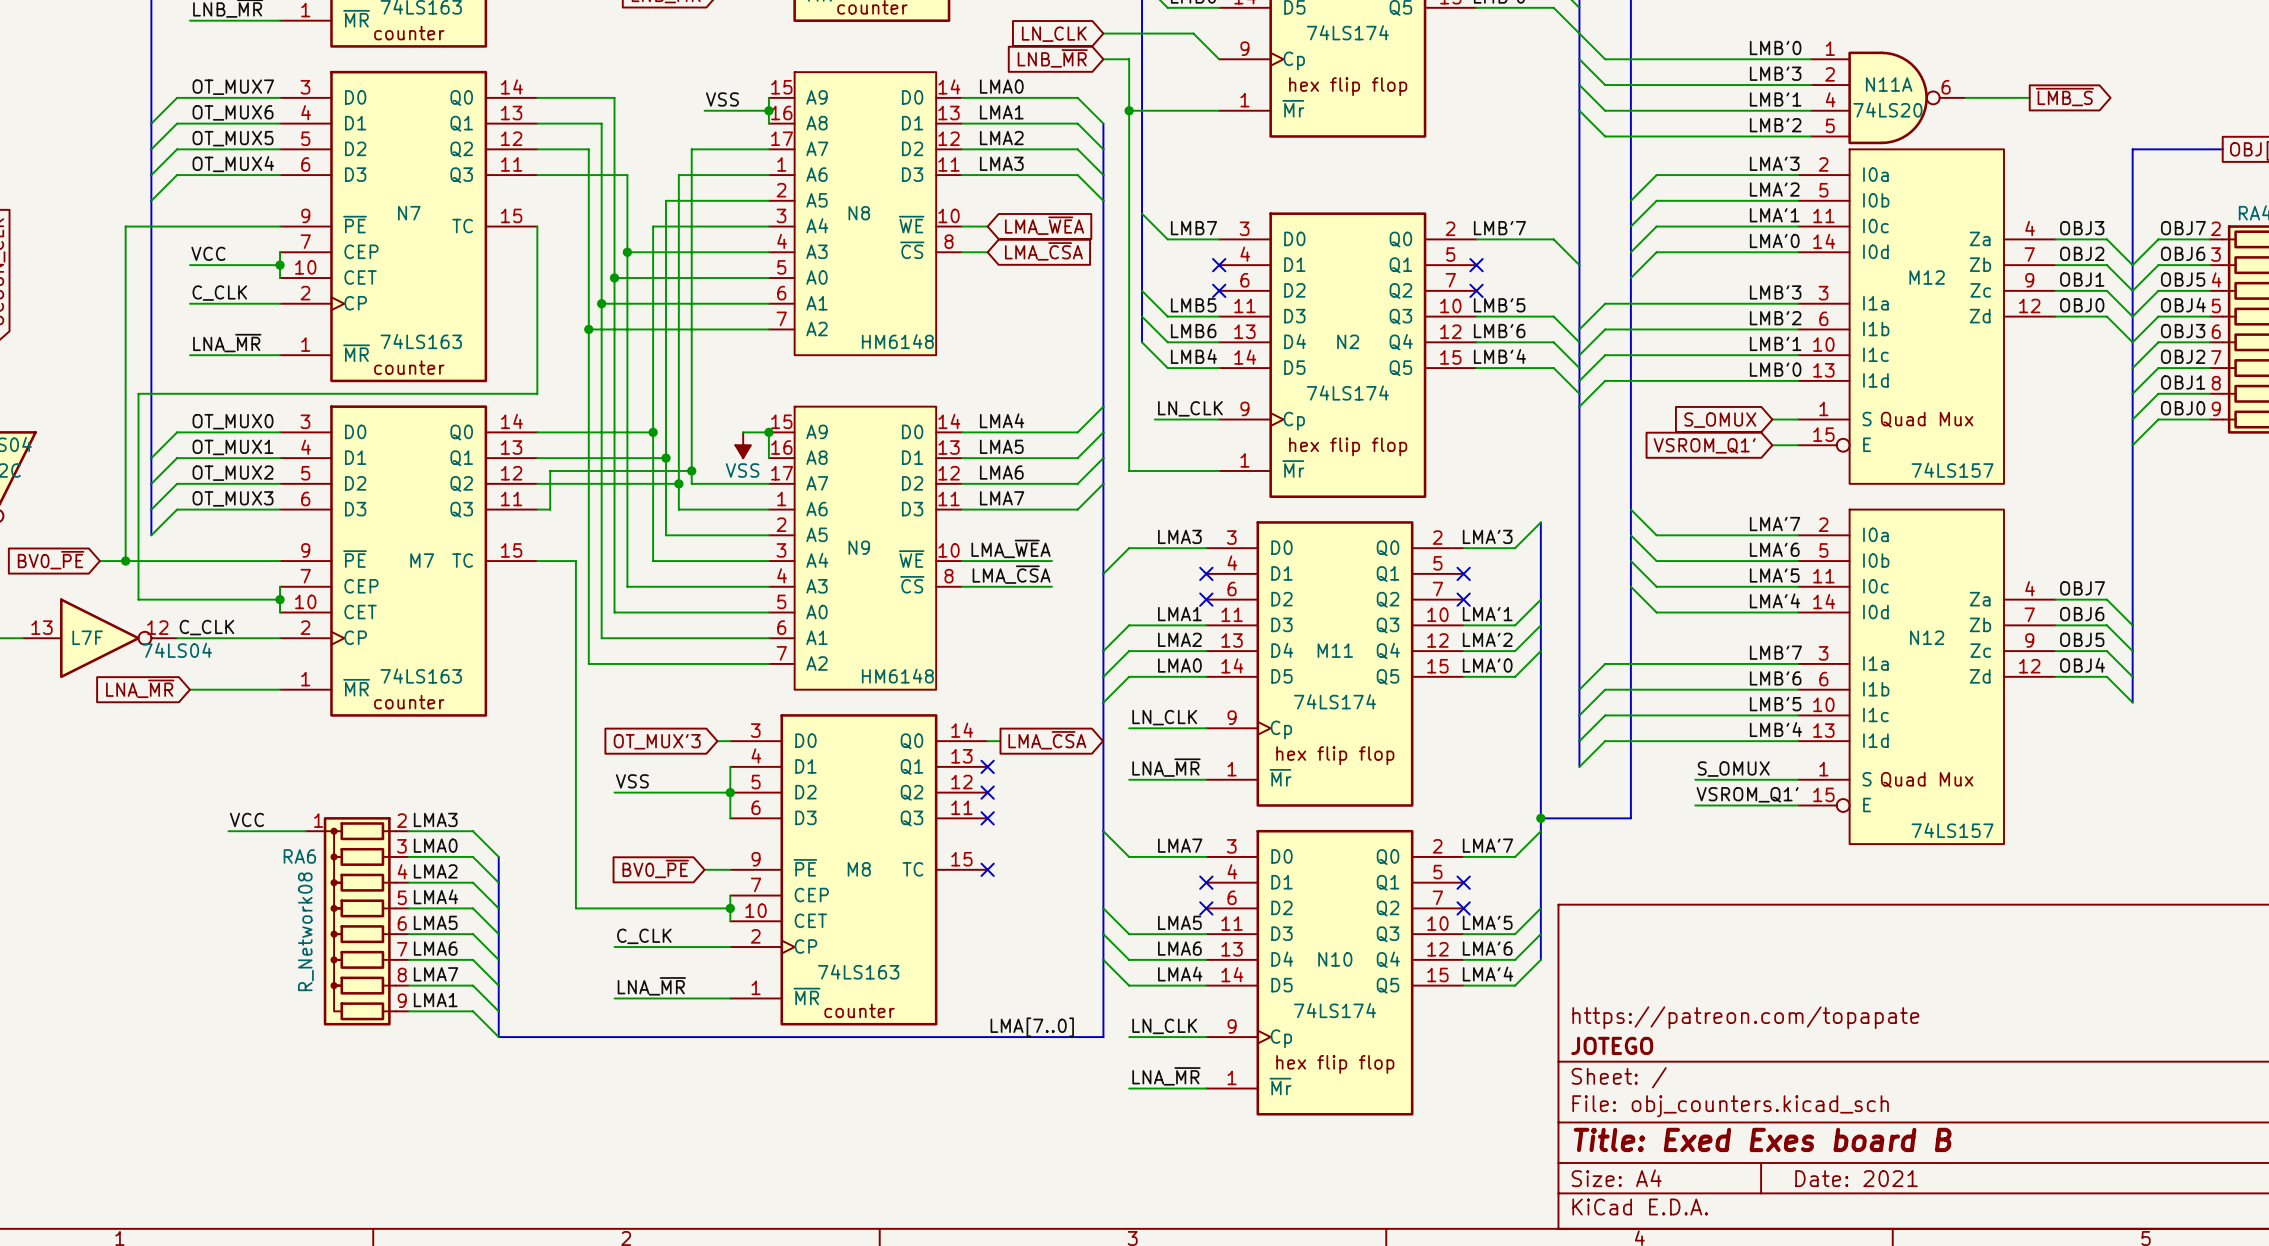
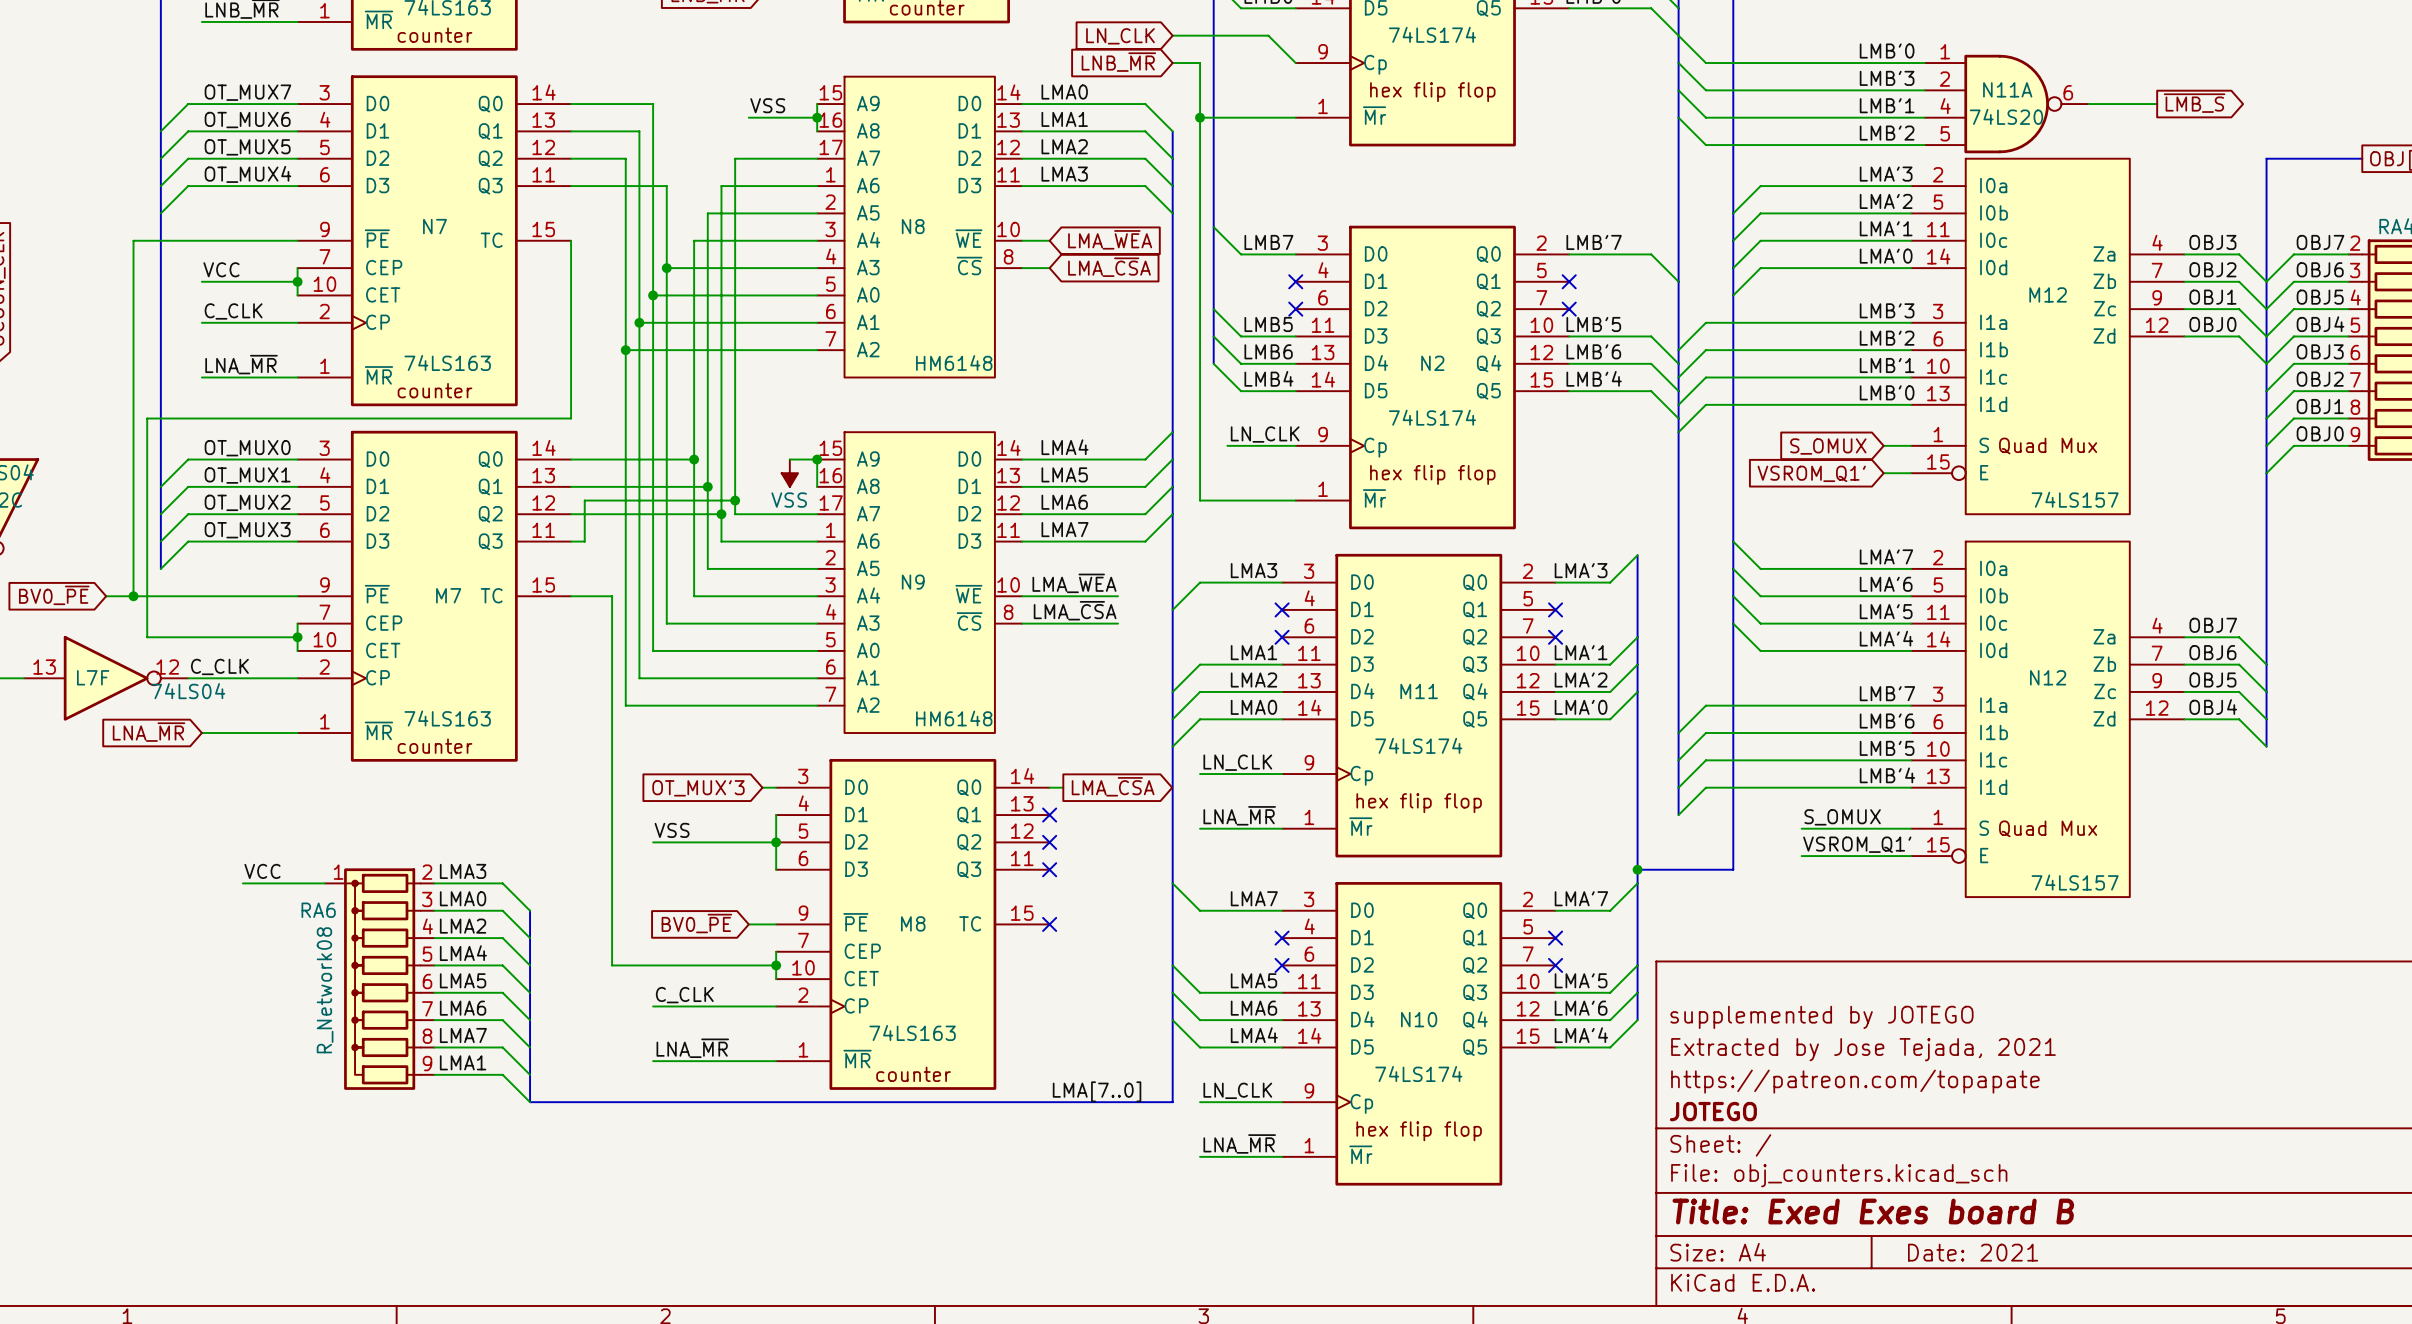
title block: none -> supplemented by JOTEGO (1821, 1017)
title block: none -> Extracted by Jose Tejada, 2021 (1863, 1049)

